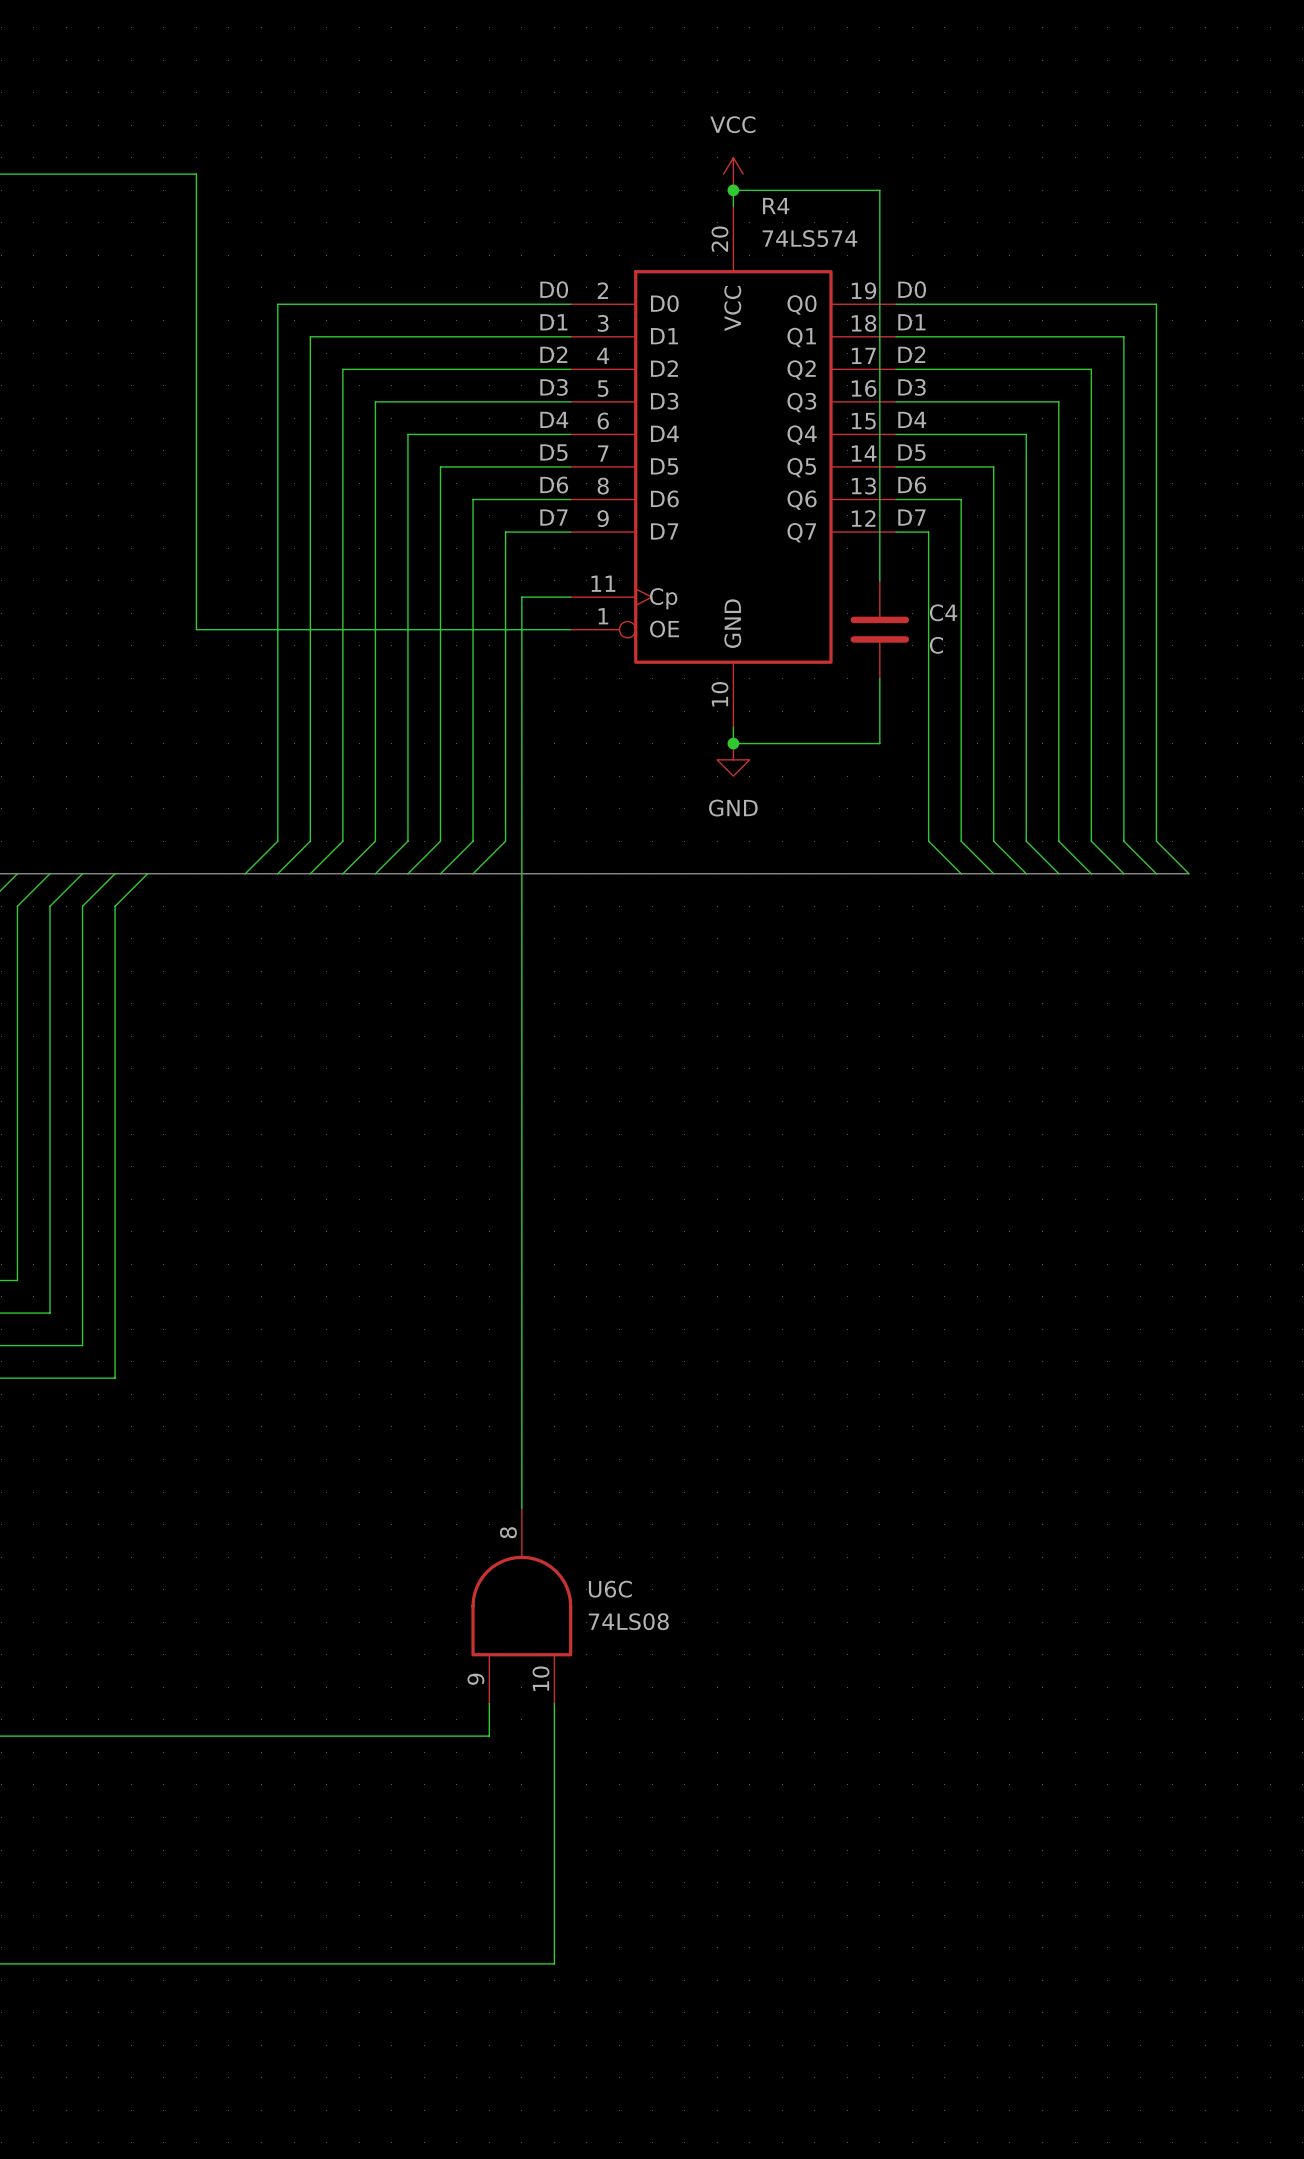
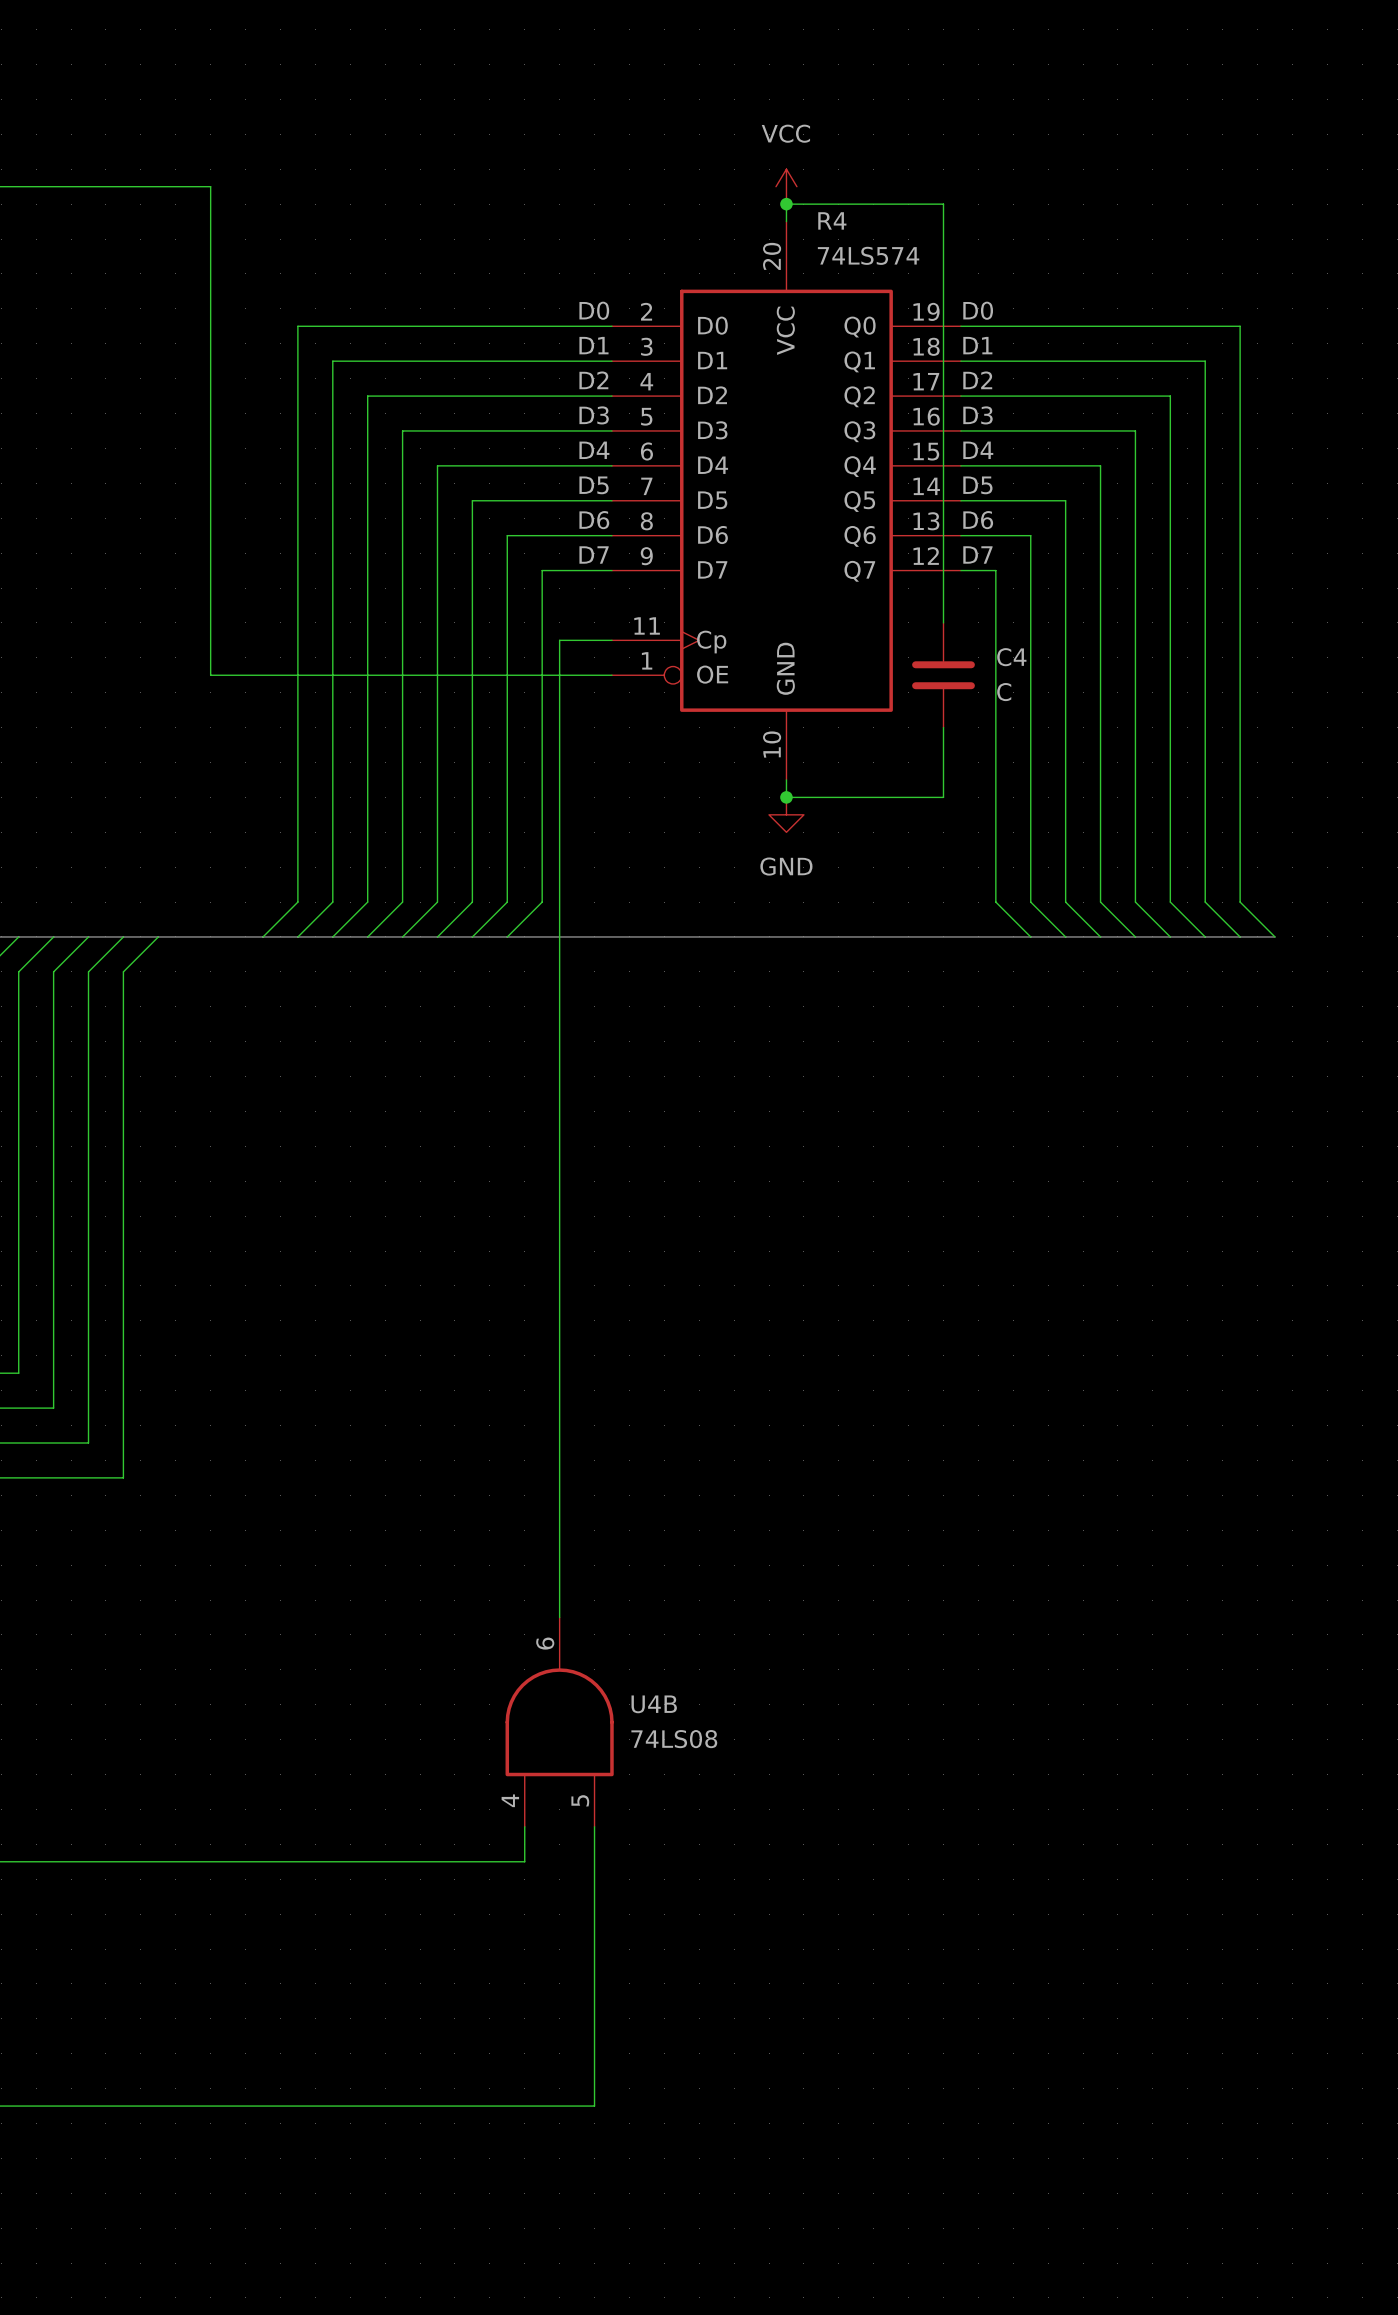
U6C pin number: 8 (508, 1532) -> 6 (545, 1643)
U6C name: U6C (610, 1589) -> U4B (654, 1704)
U6C pin number: 10 (540, 1678) -> 5 (580, 1800)
U6C pin number: 9 (475, 1679) -> 4 (510, 1800)

